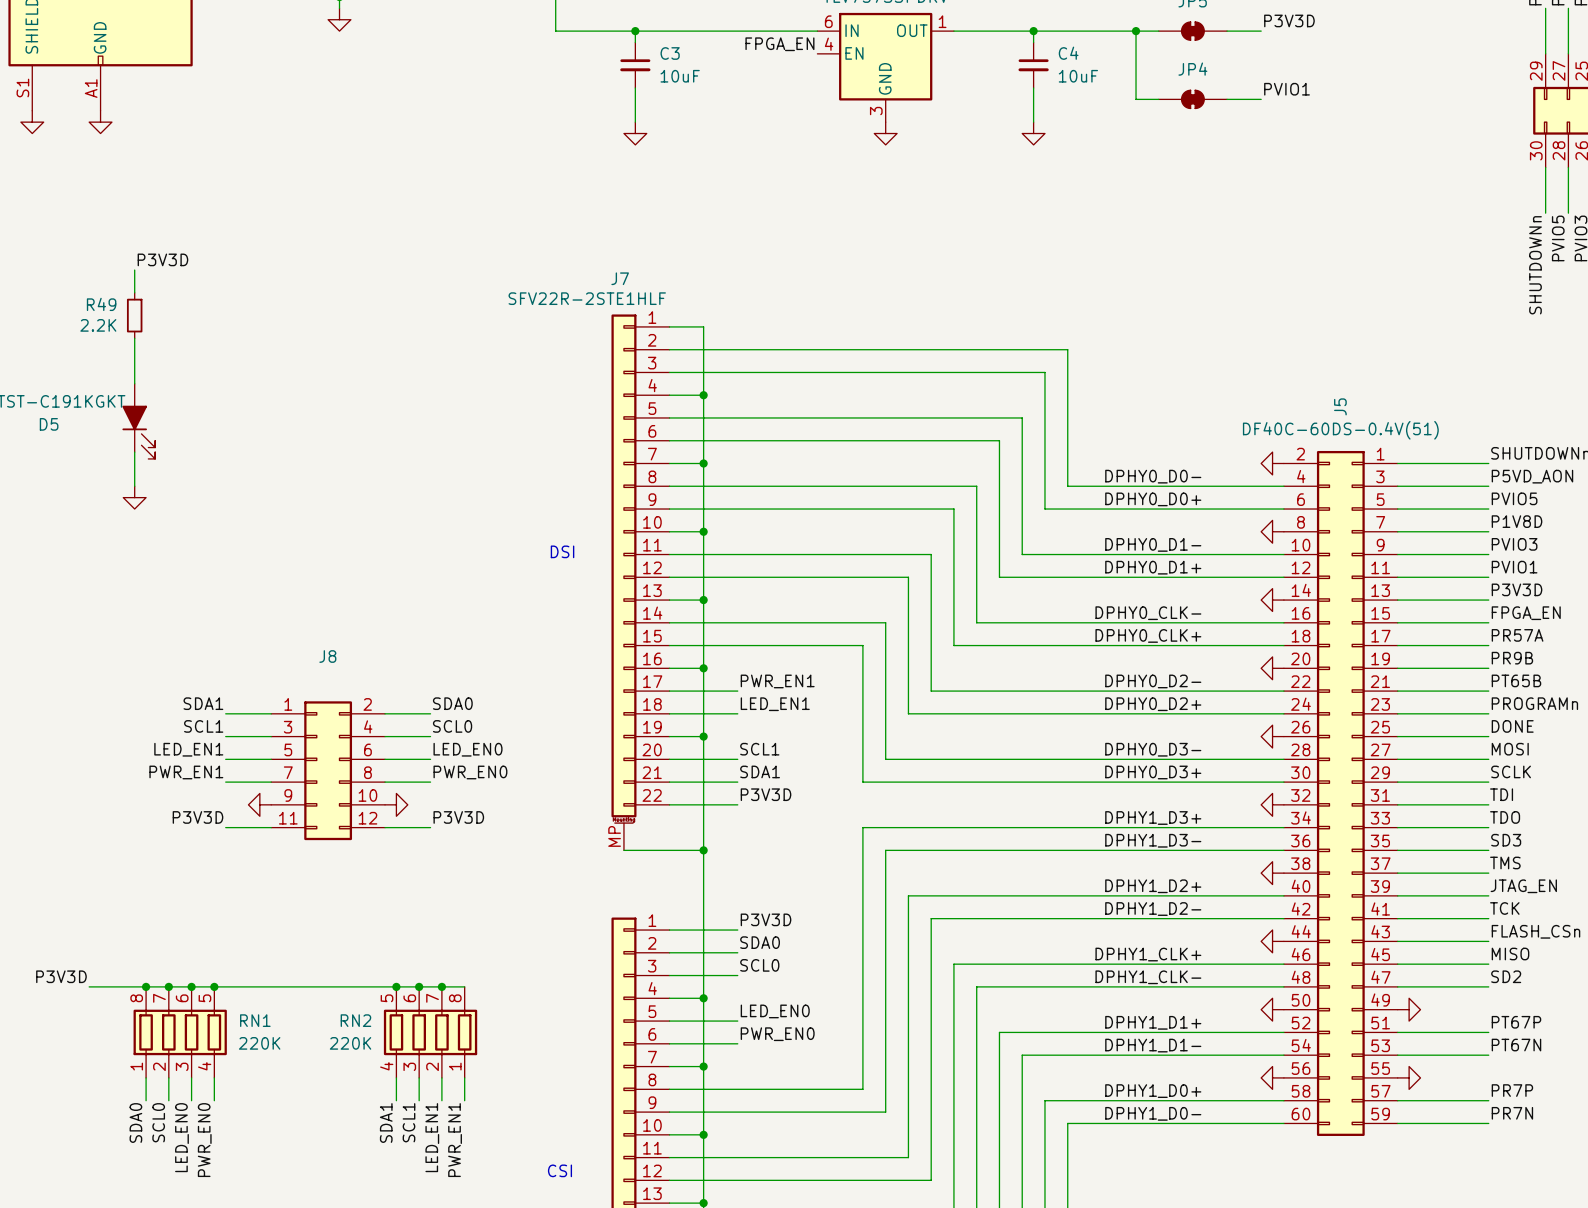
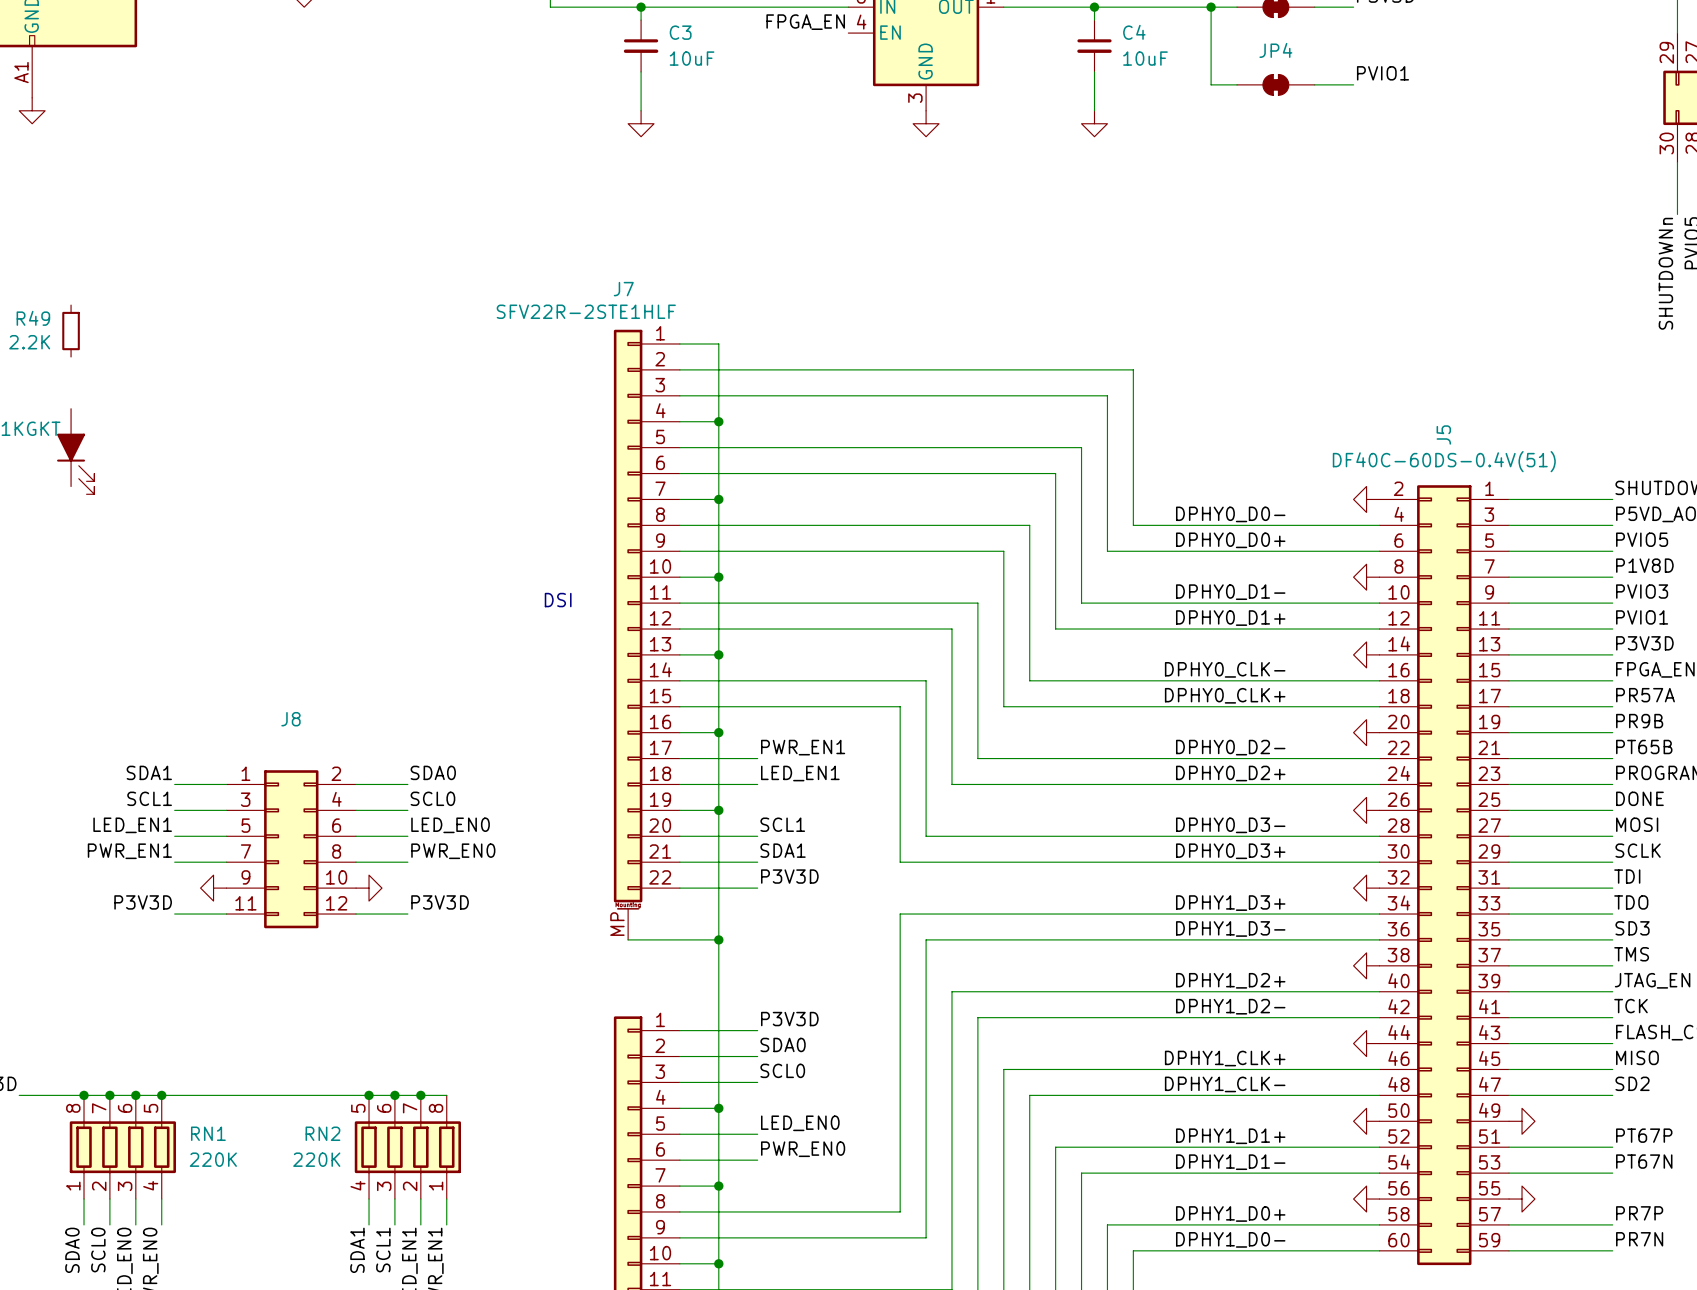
label: P3V3D (162, 259) -> none
wire: (134, 270) (134, 292) -> none
wire: (134, 338) (134, 383) -> none
wire: (134, 452) (134, 486) -> none
power symbol: (134, 497) -> none

